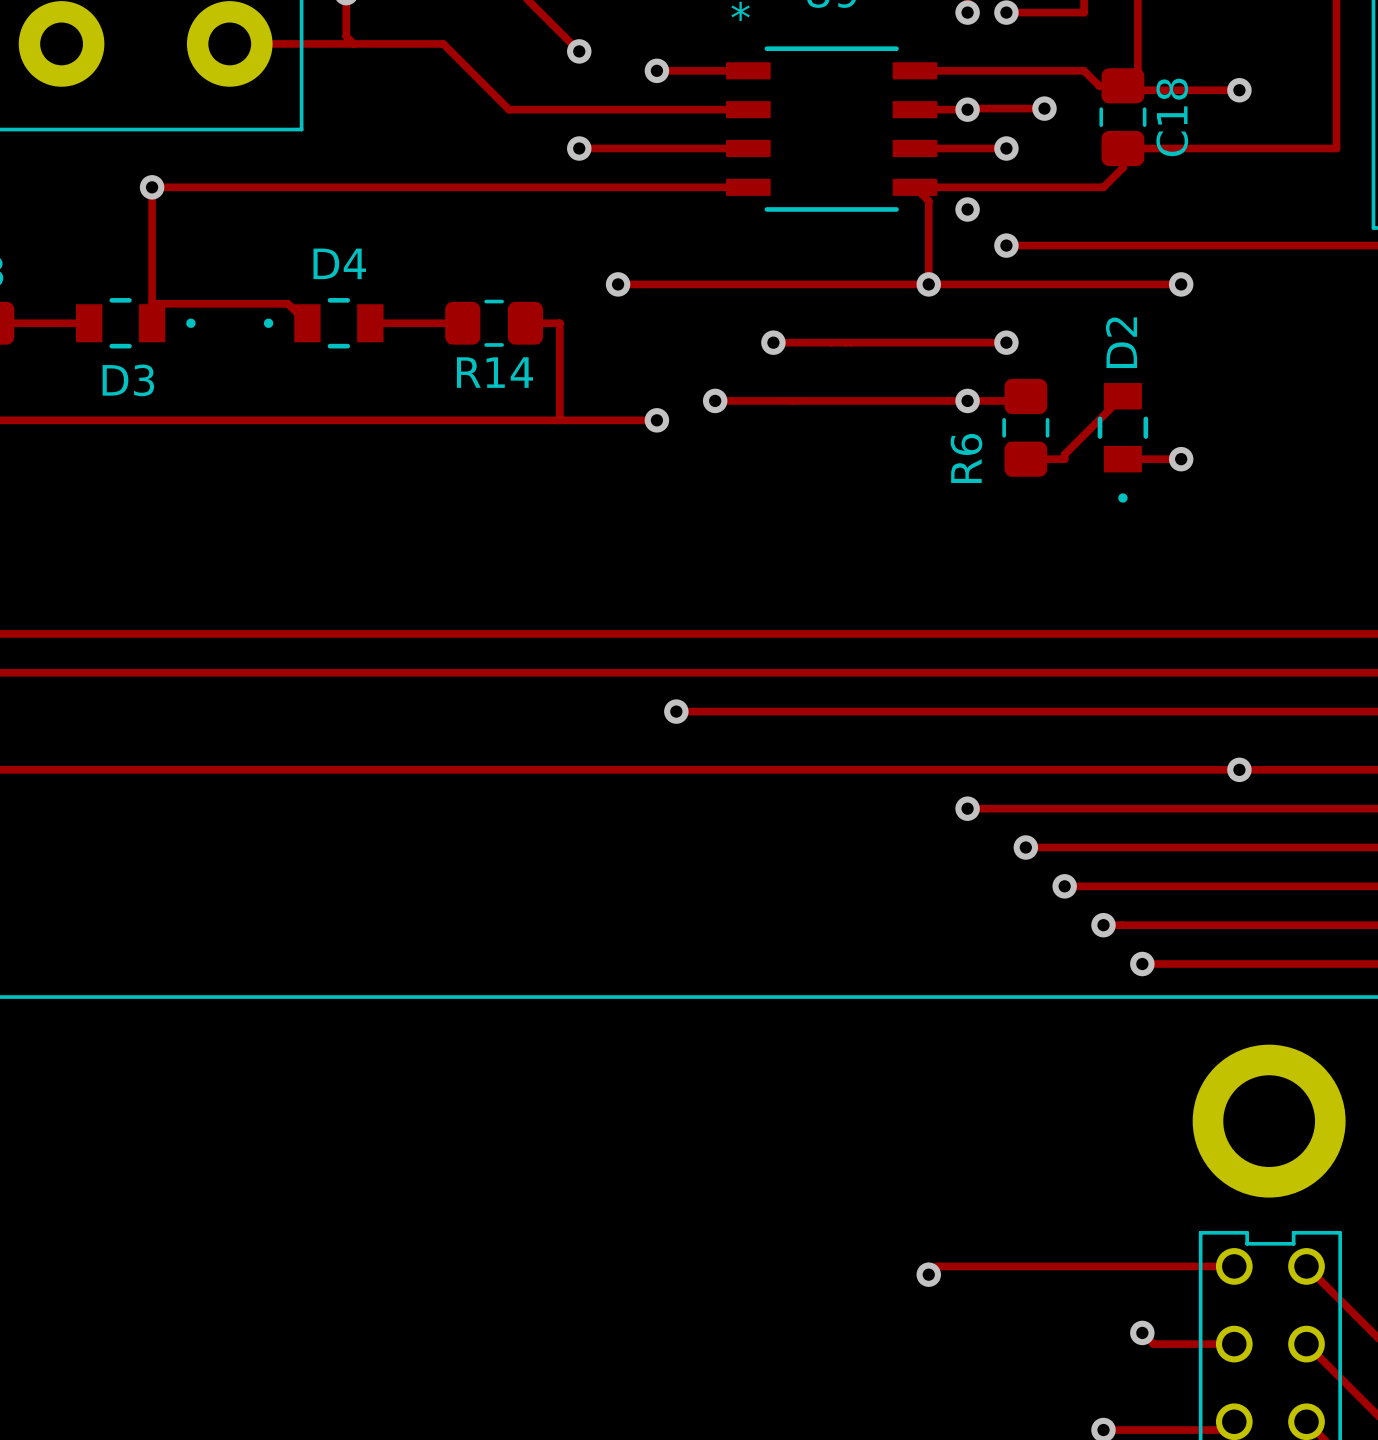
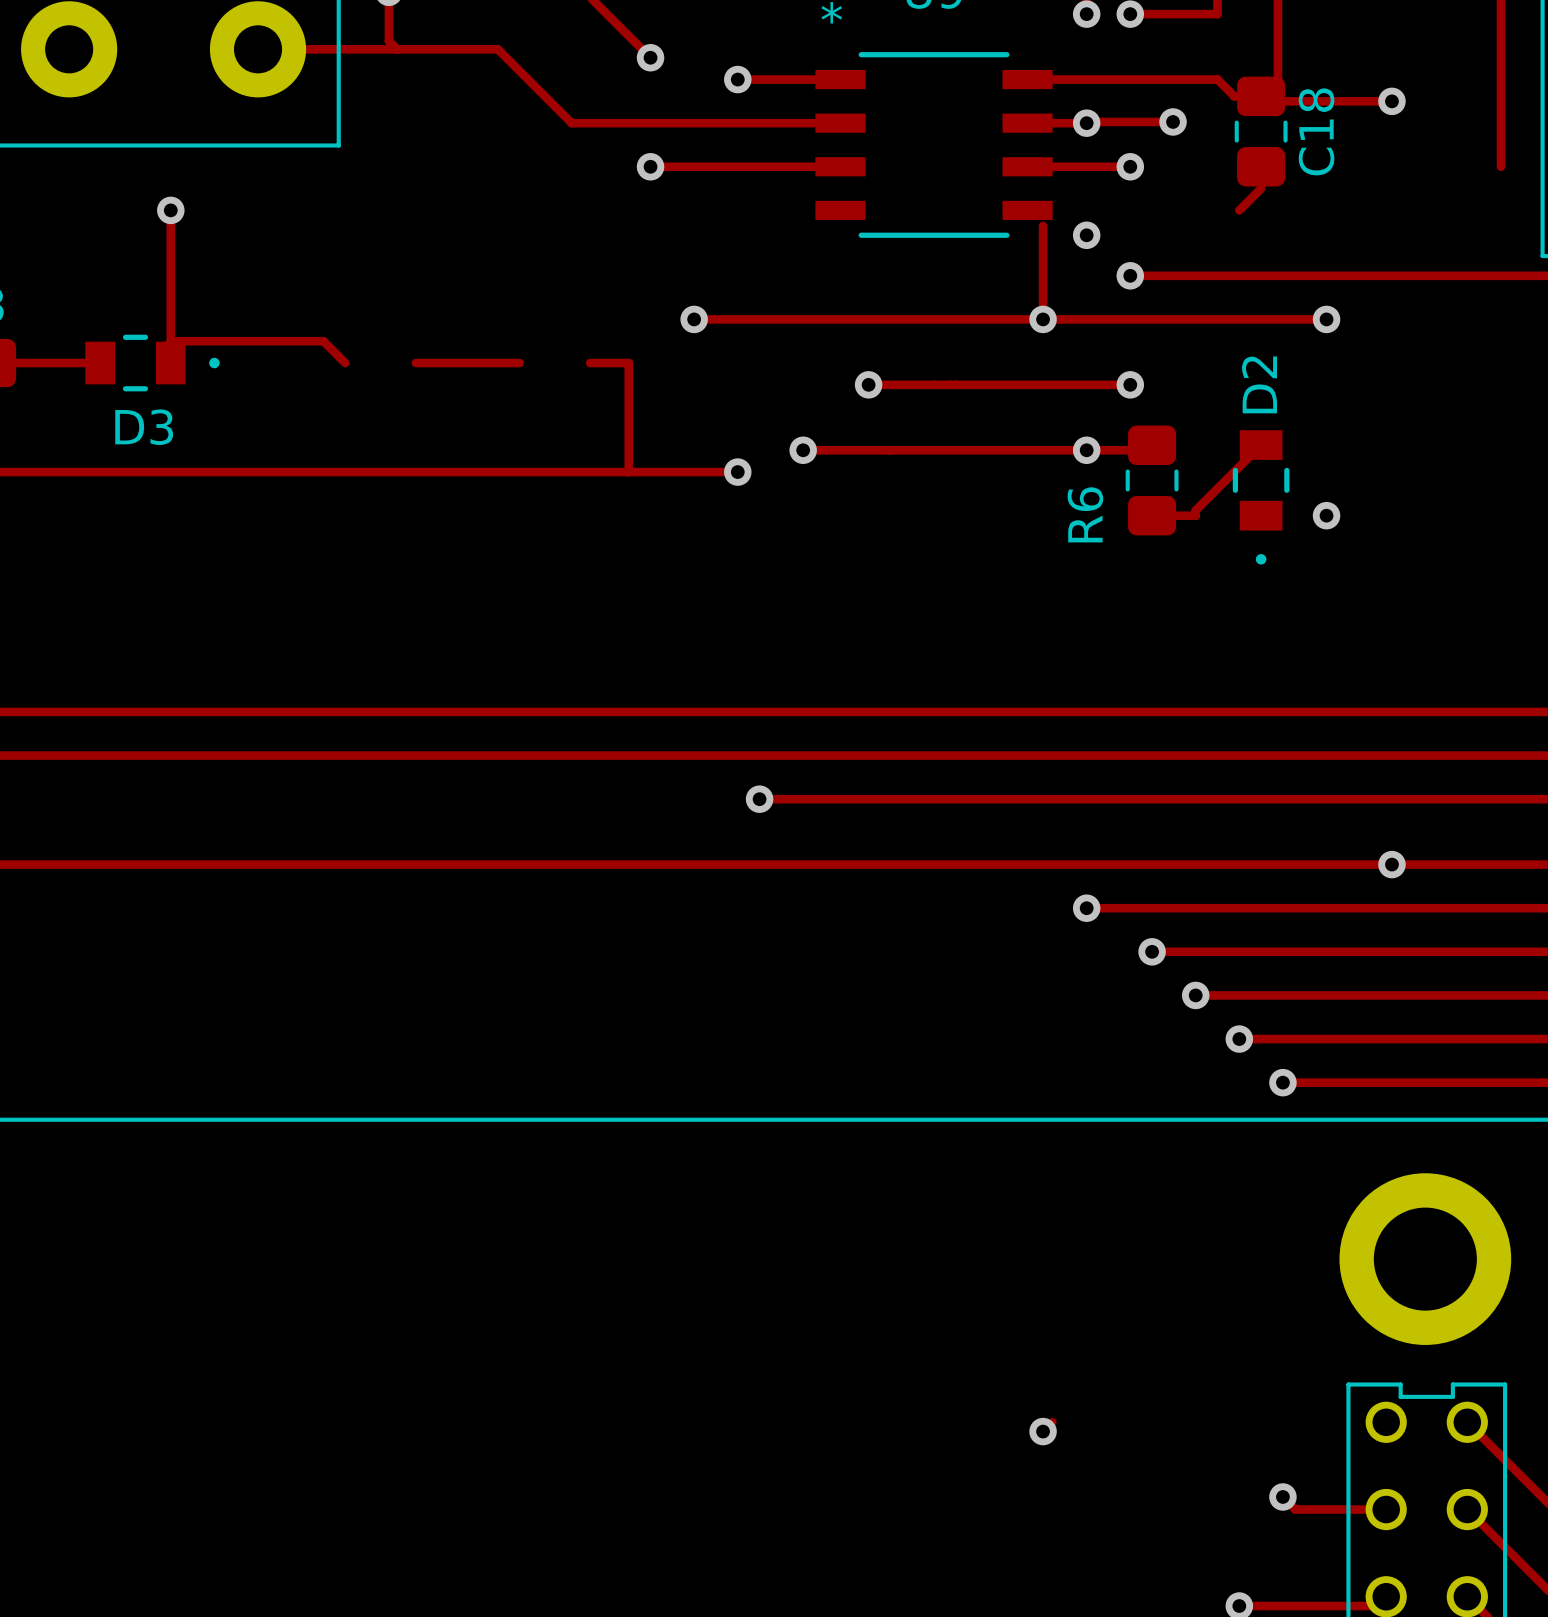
track: (1336, 148) (1122, 148) (1122, 167) -> none
track: (152, 187) (748, 187) -> none
track: (1103, 187) (914, 187) (928, 201) -> none
D4: (323, 323) -> none
R14: (494, 323) -> none
track: (1122, 459) (1181, 459) -> none
track: (937, 1266) (1234, 1266) -> none

